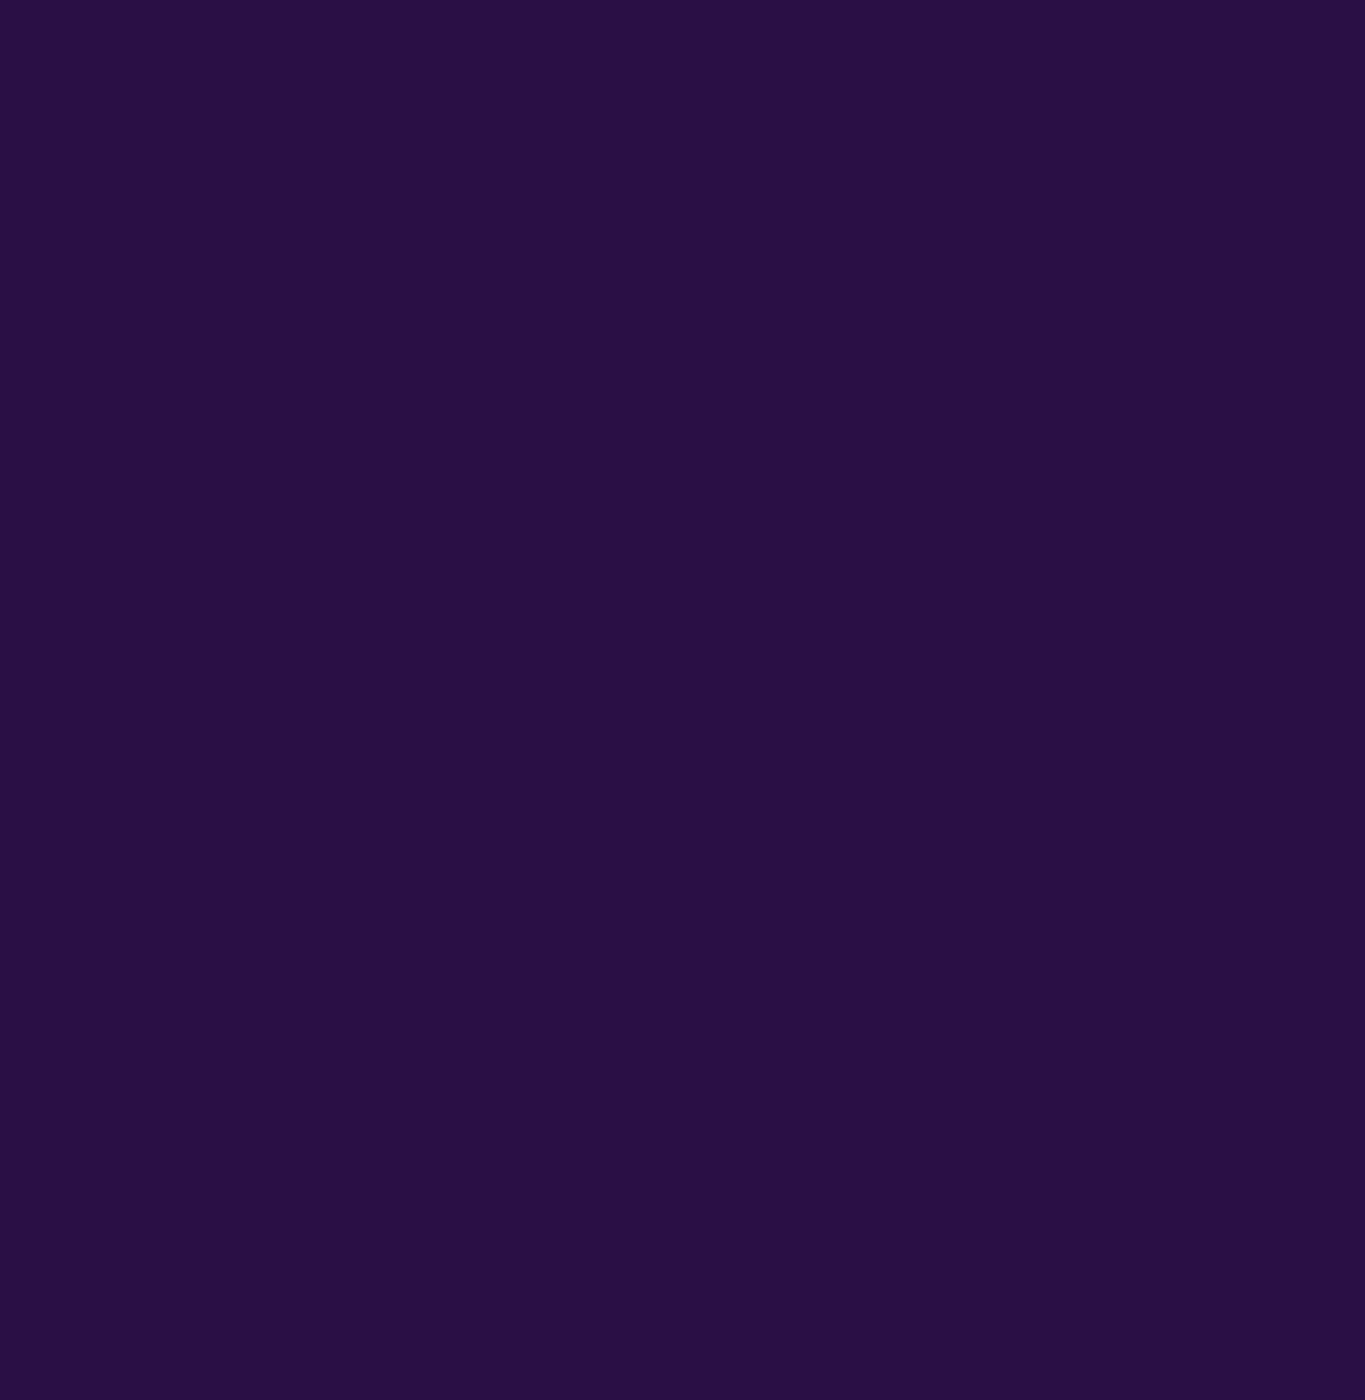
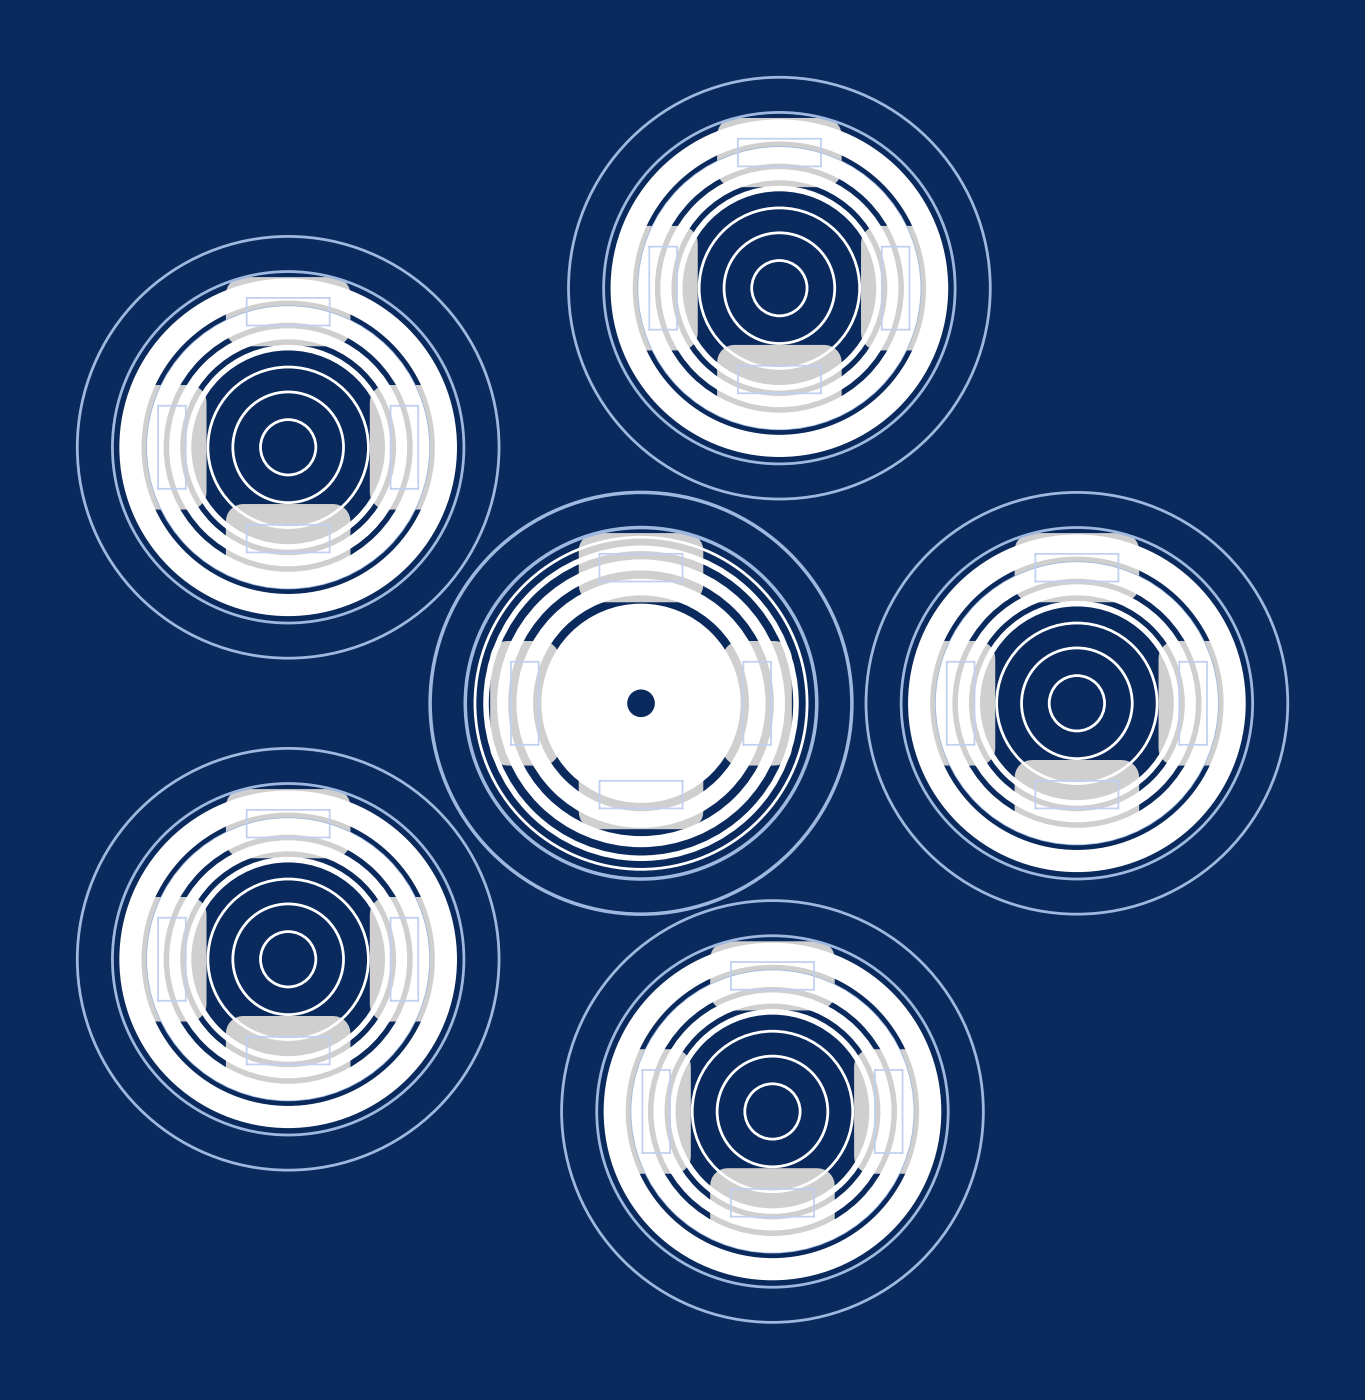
part: none -> (779, 288)
part: none -> (288, 447)
part: none -> (641, 703)
part: none -> (1076, 703)
part: none -> (288, 959)
part: none -> (772, 1111)

